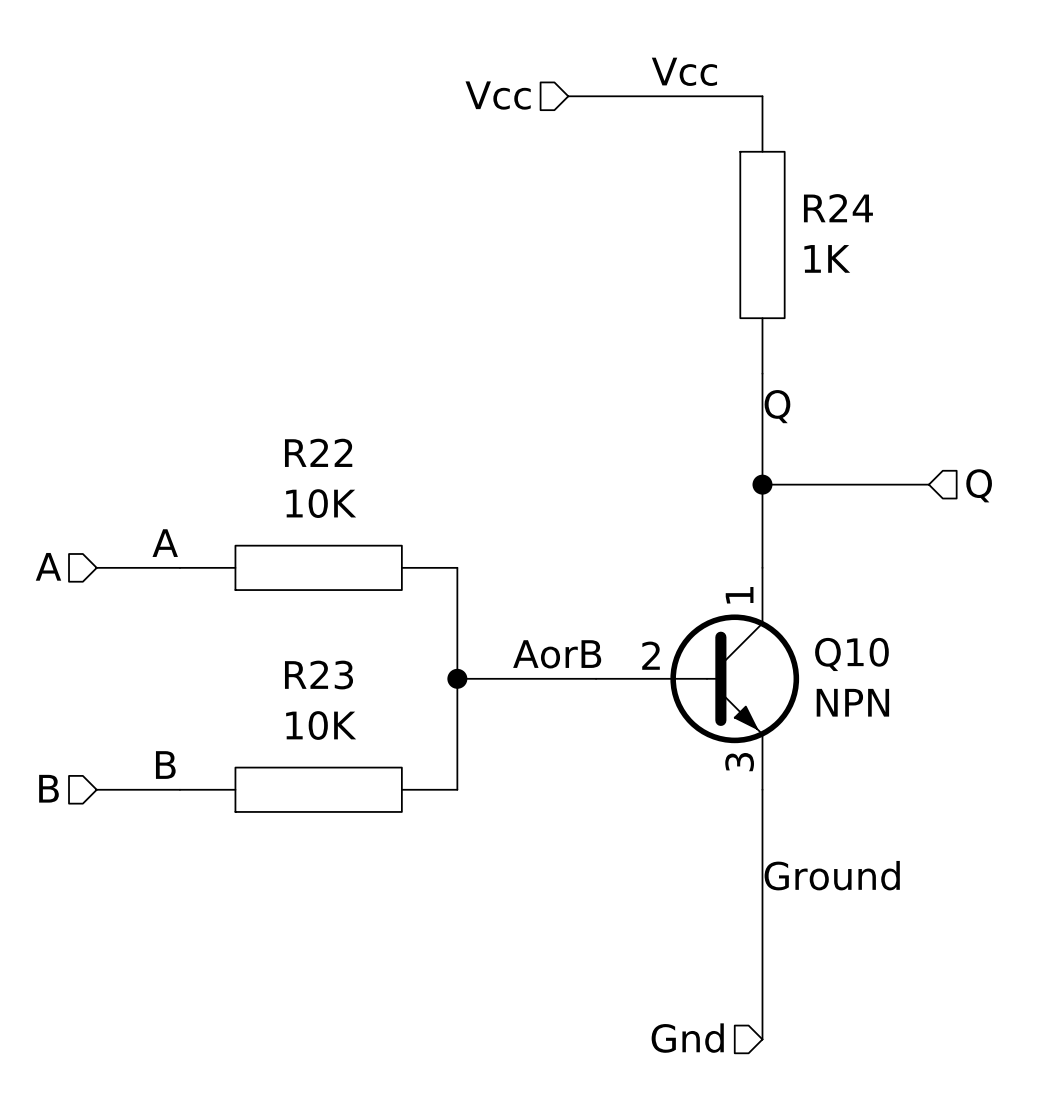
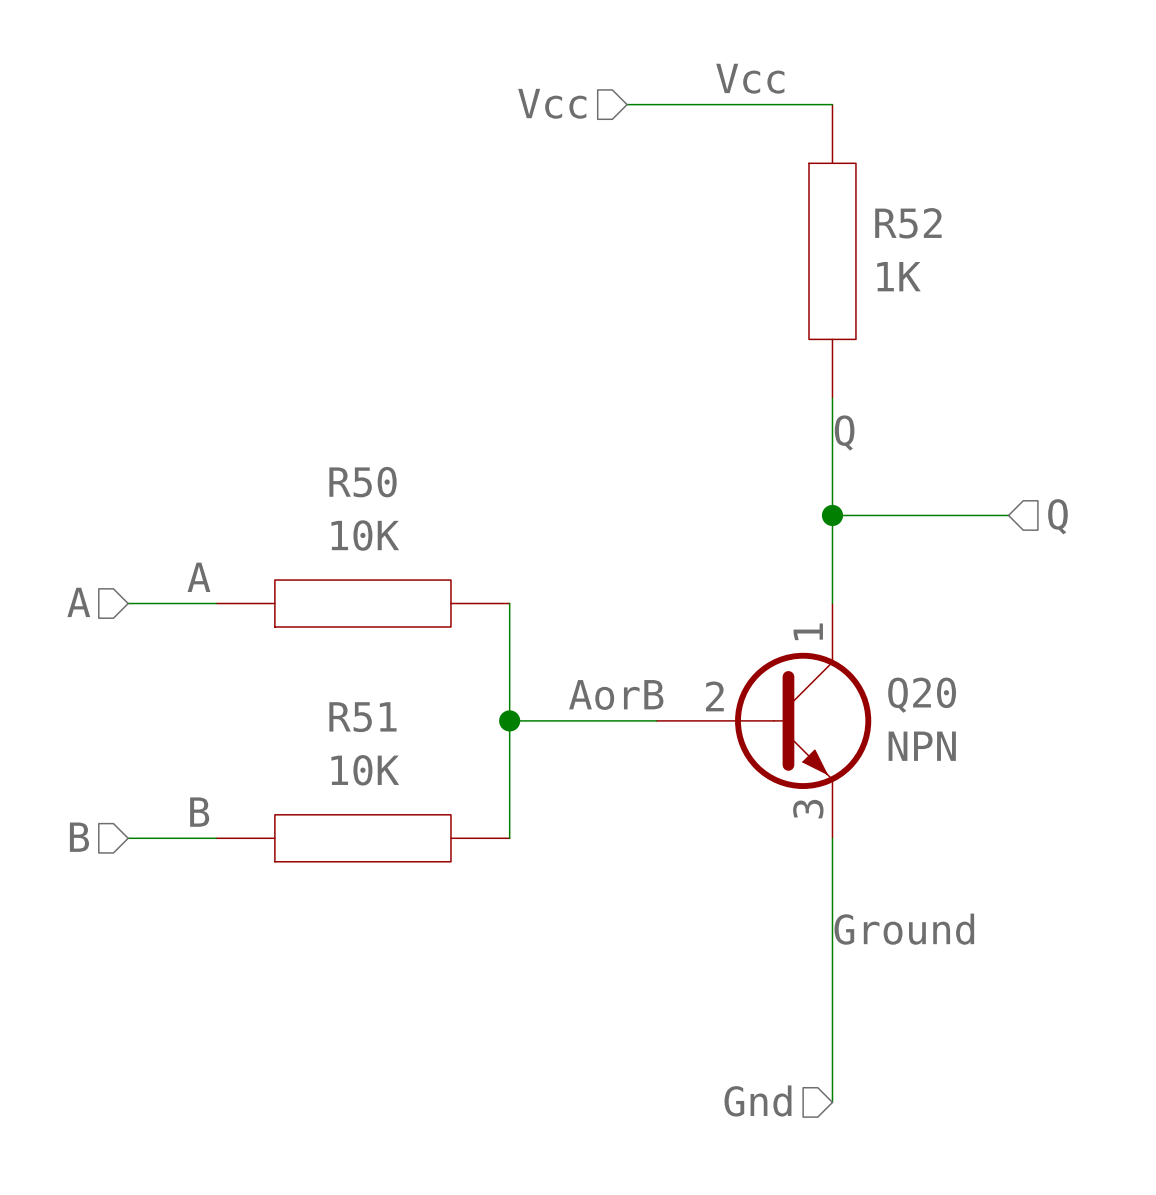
R24 name: R24 (838, 208) -> R52 (908, 223)
R22 name: R22 (318, 452) -> R50 (363, 482)
Q10 name: Q10 (851, 654) -> Q20 (922, 695)
R23 name: R23 (319, 675) -> R51 (362, 717)

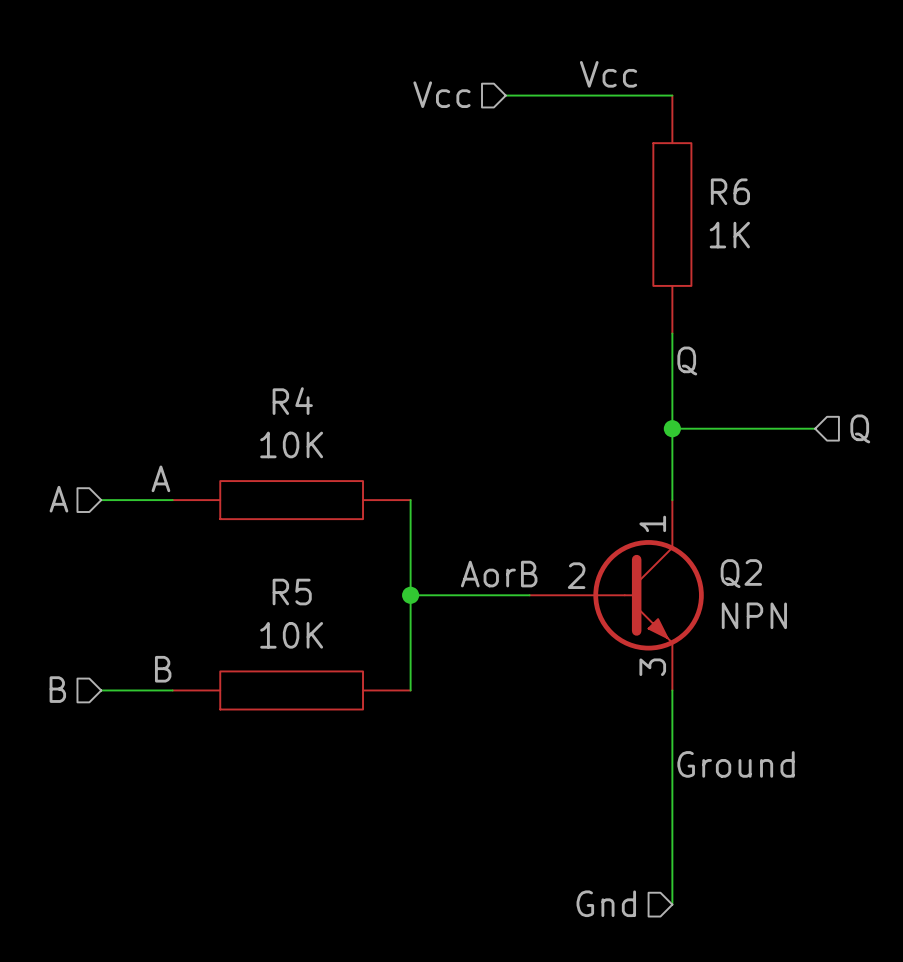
R52 name: R52 (908, 223) -> R6 (730, 191)
R50 name: R50 (363, 482) -> R4 (292, 401)
Q20 name: Q20 (922, 695) -> Q2 (741, 573)
R51 name: R51 (362, 717) -> R5 (292, 592)

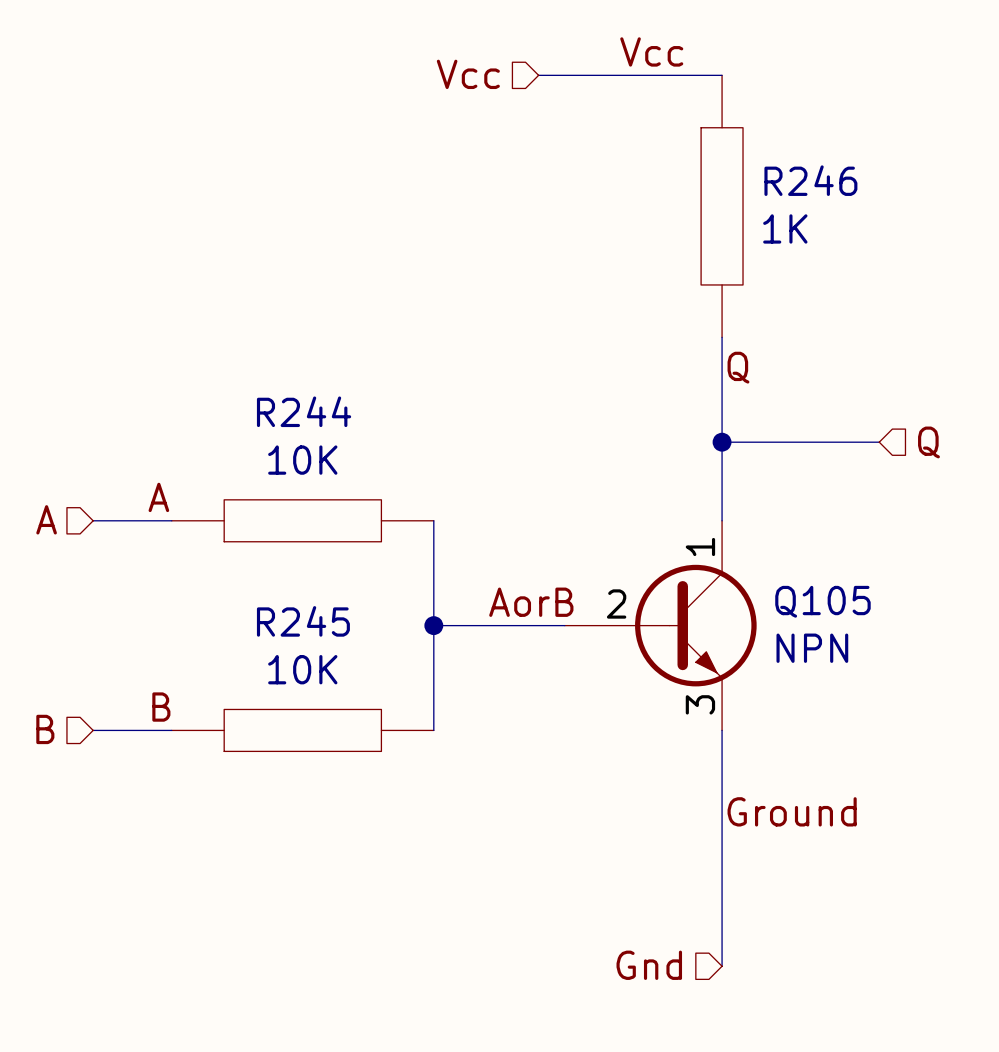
R6 name: R6 (730, 191) -> R246 (810, 180)
R4 name: R4 (292, 401) -> R244 (304, 411)
Q2 name: Q2 (741, 573) -> Q105 (822, 601)
R5 name: R5 (292, 592) -> R245 (303, 621)

